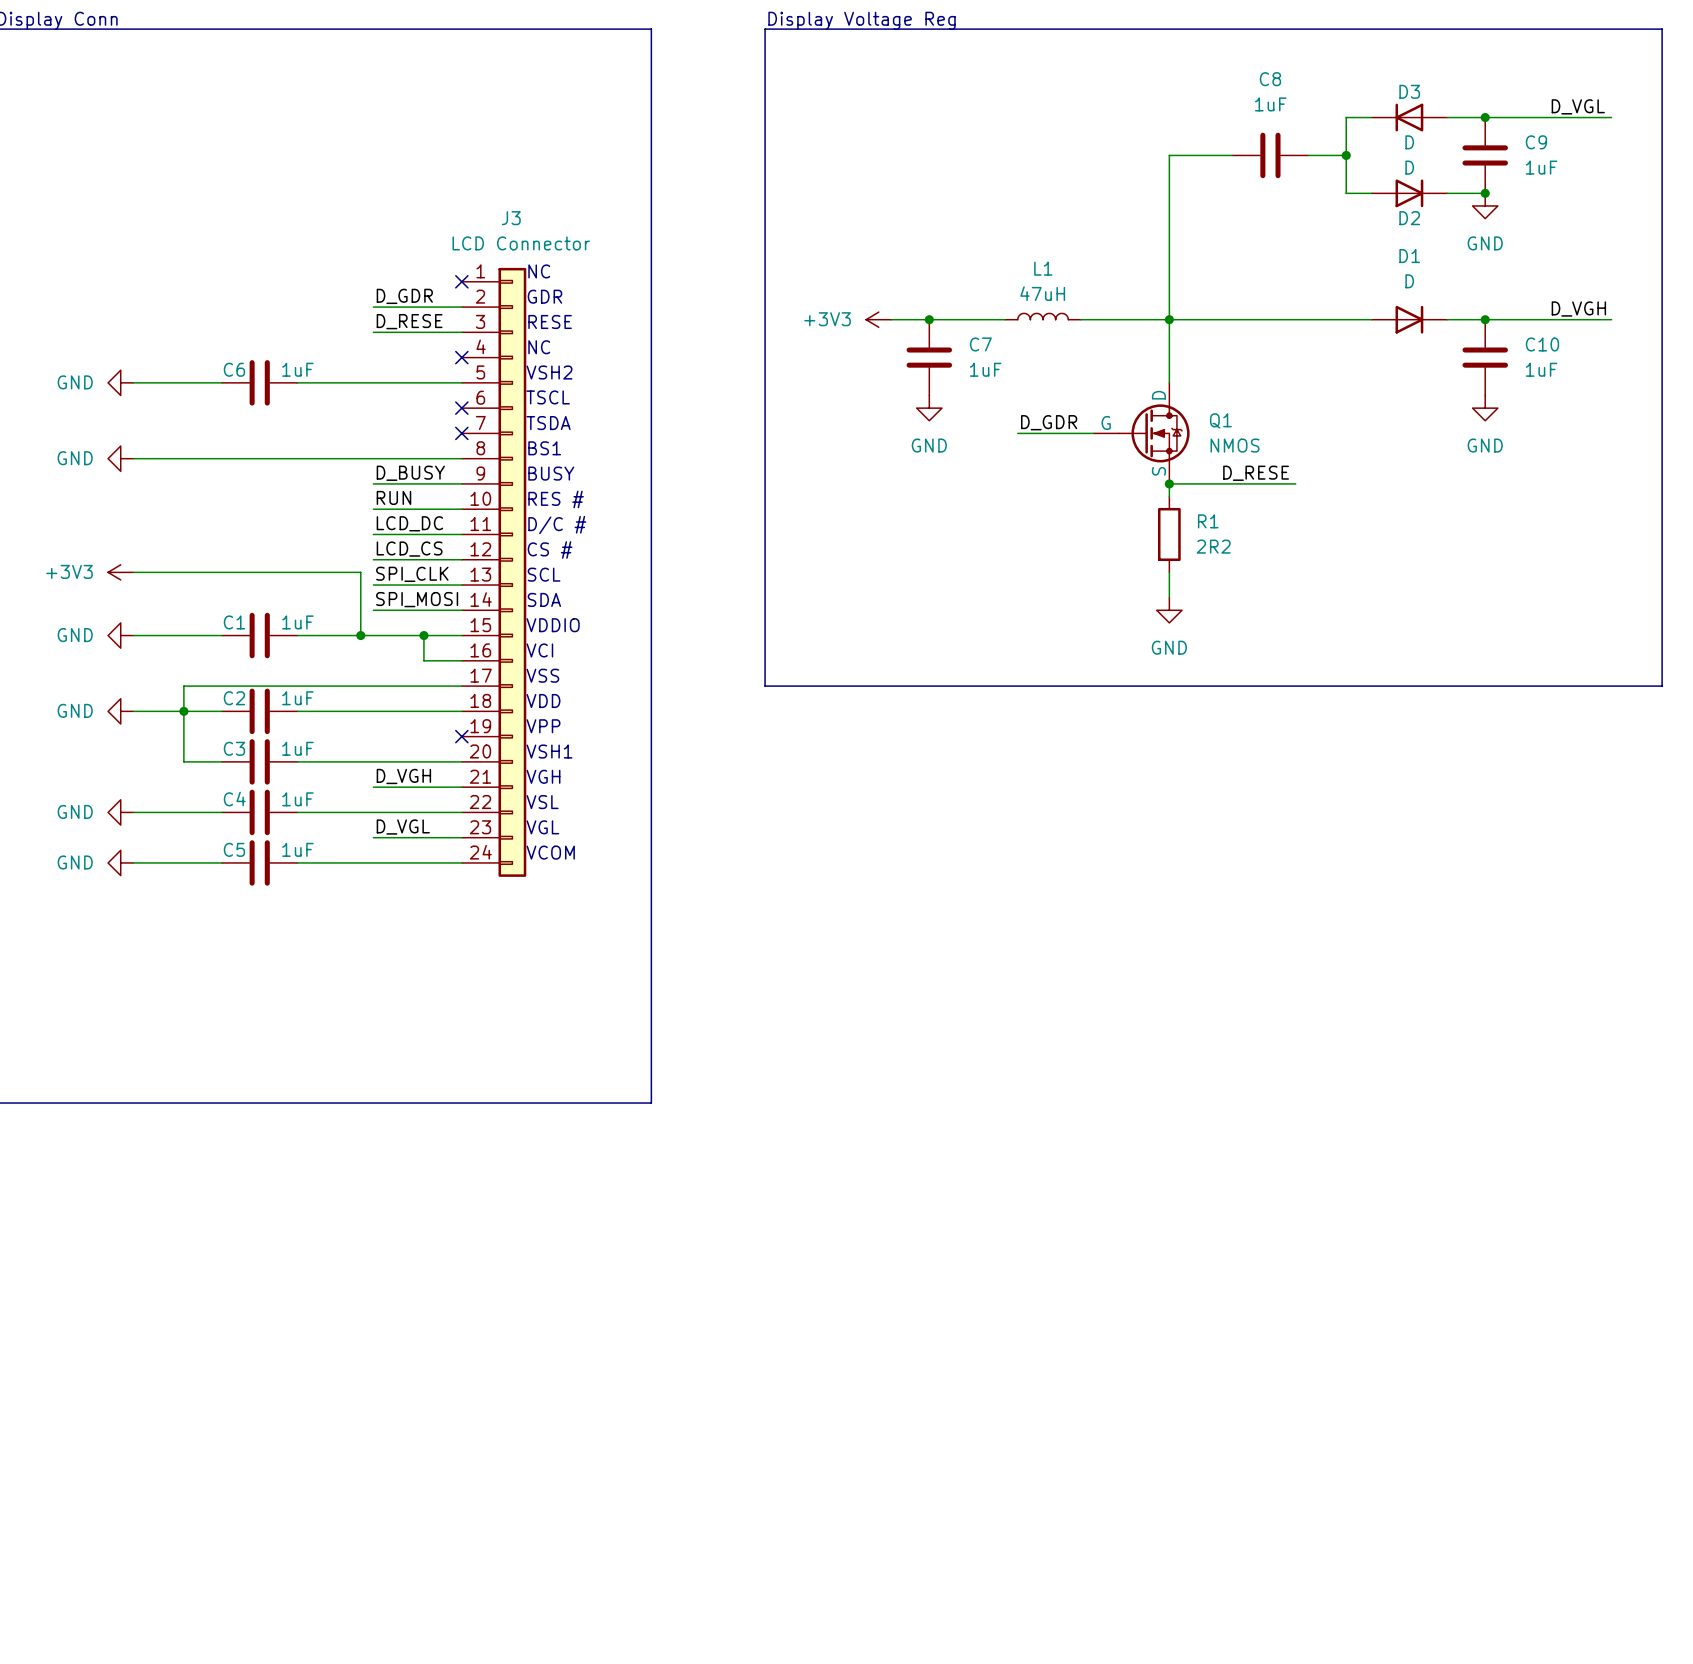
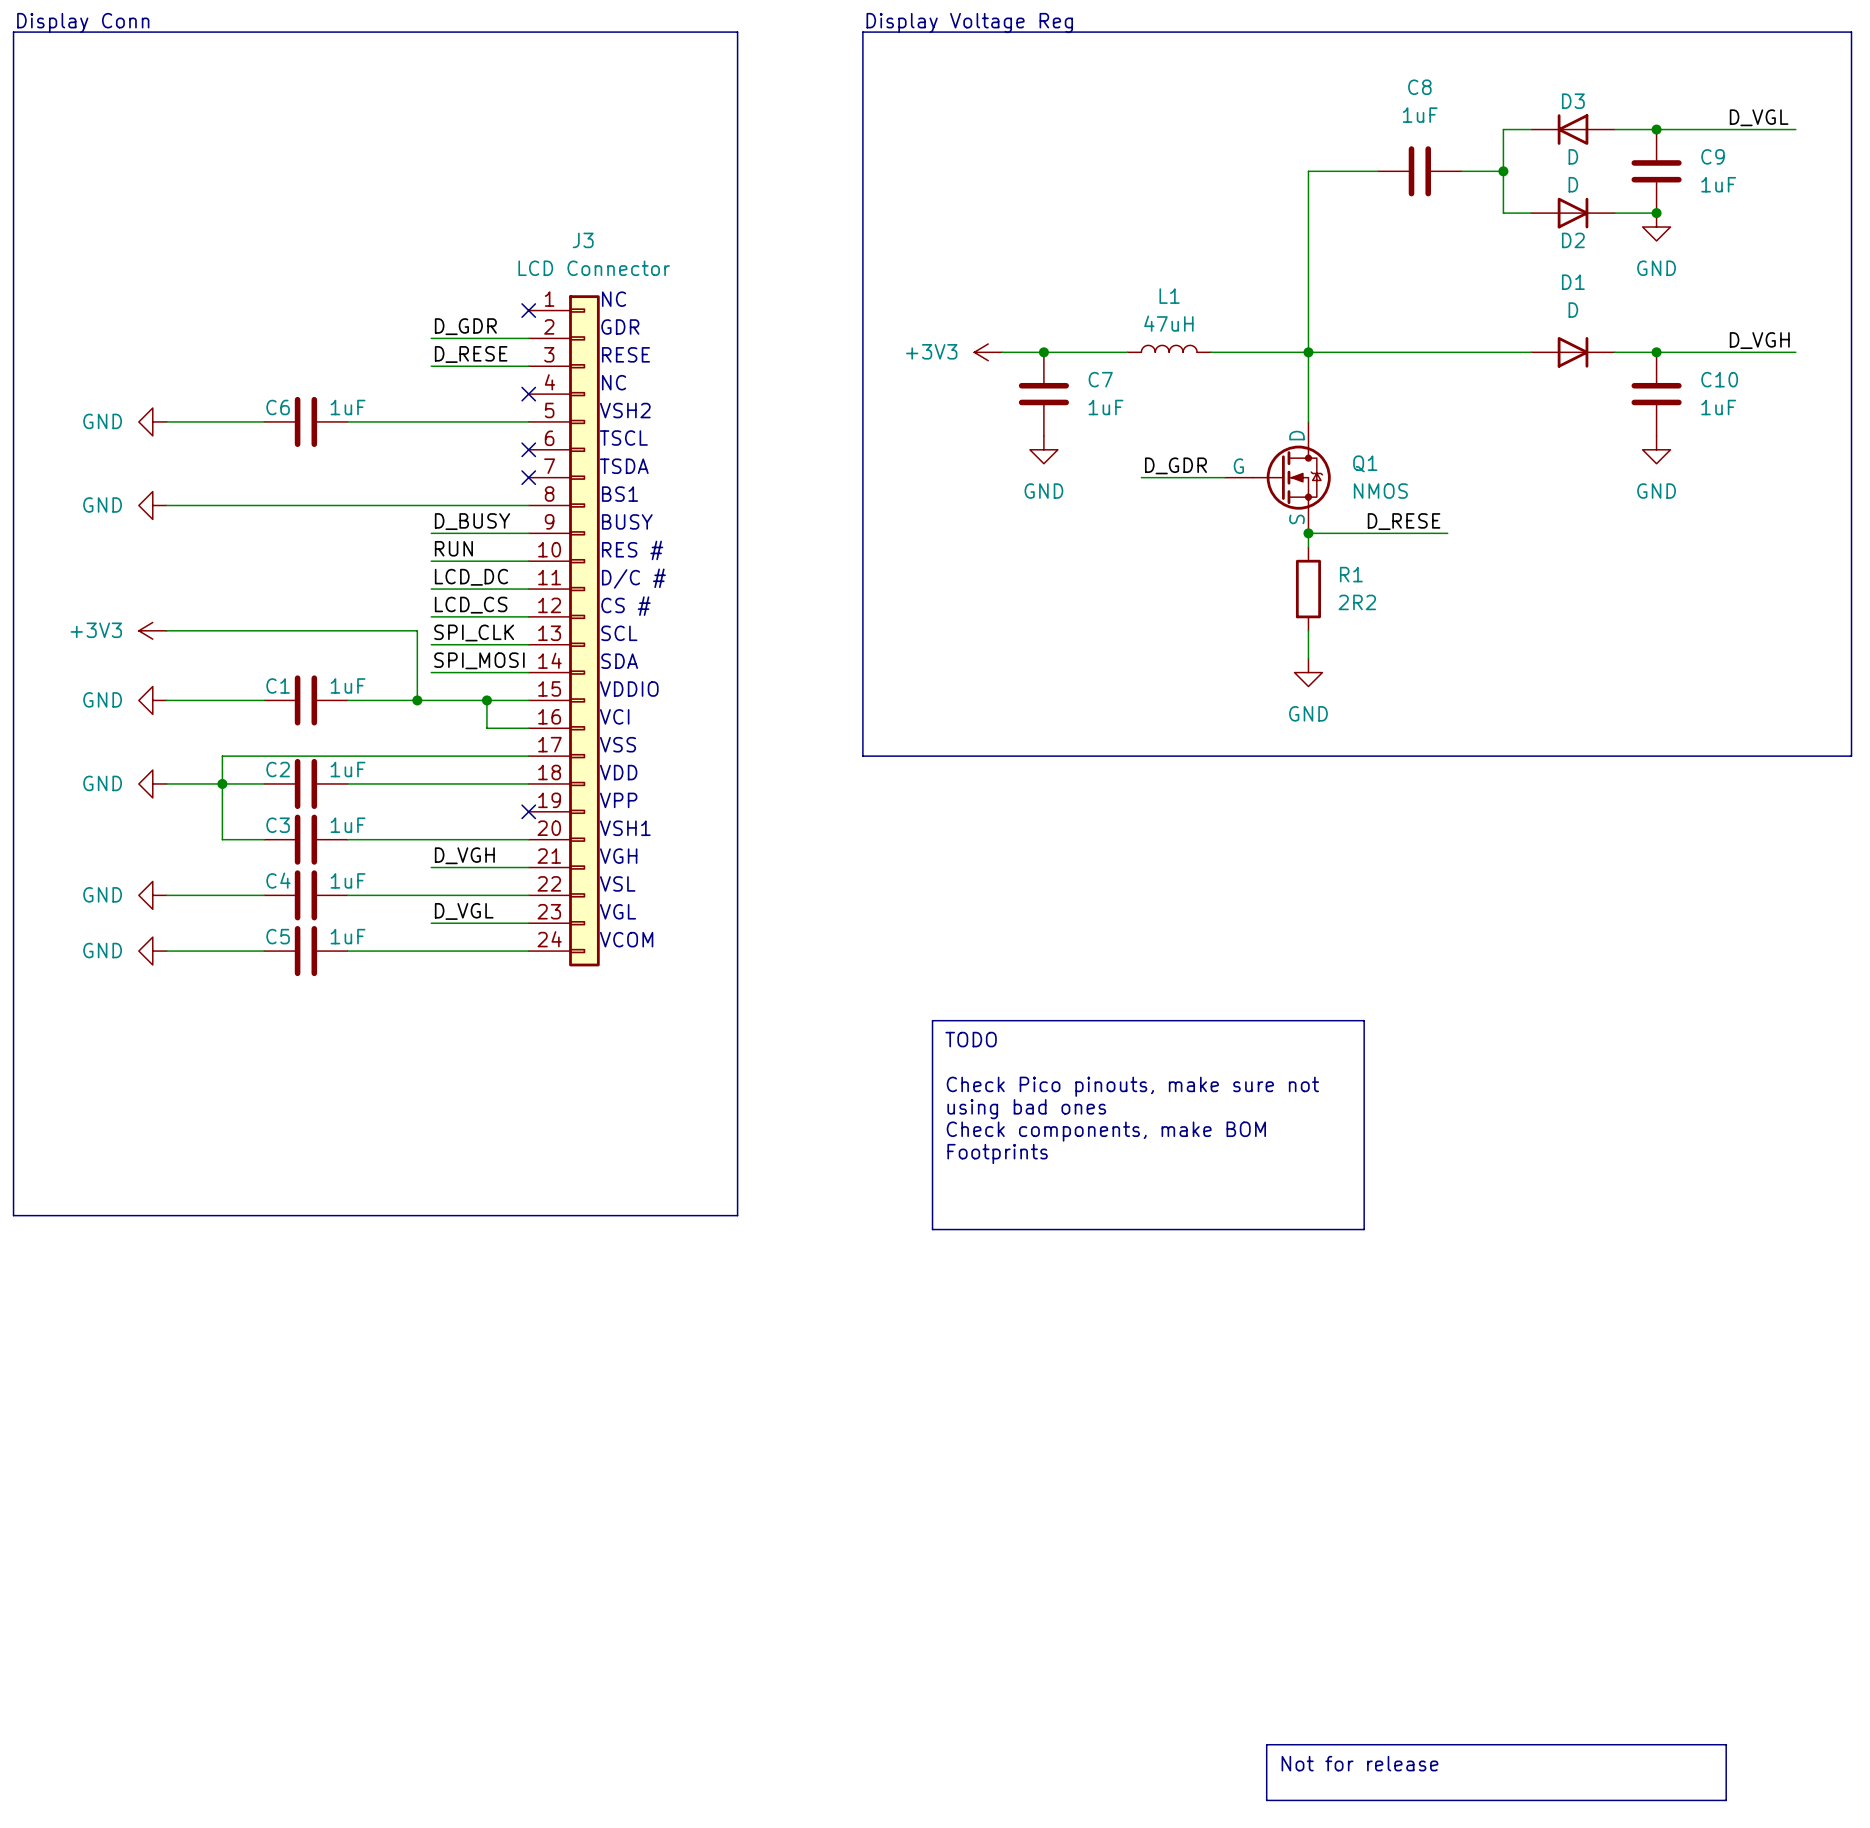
line: none -> (932, 1020) (1364, 1020) (1364, 1229) (932, 1229) (932, 1020)
text: none -> TODO (971, 1039)
text: none -> Check Pico pinouts, make sure not (1132, 1086)
text: none -> using bad ones (1026, 1109)
text: none -> Check components, make BOM (1106, 1131)
text: none -> Footprints (997, 1153)
line: none -> (1266, 1744) (1726, 1744) (1726, 1800) (1266, 1800) (1266, 1744)
text: none -> Not for release (1359, 1763)

